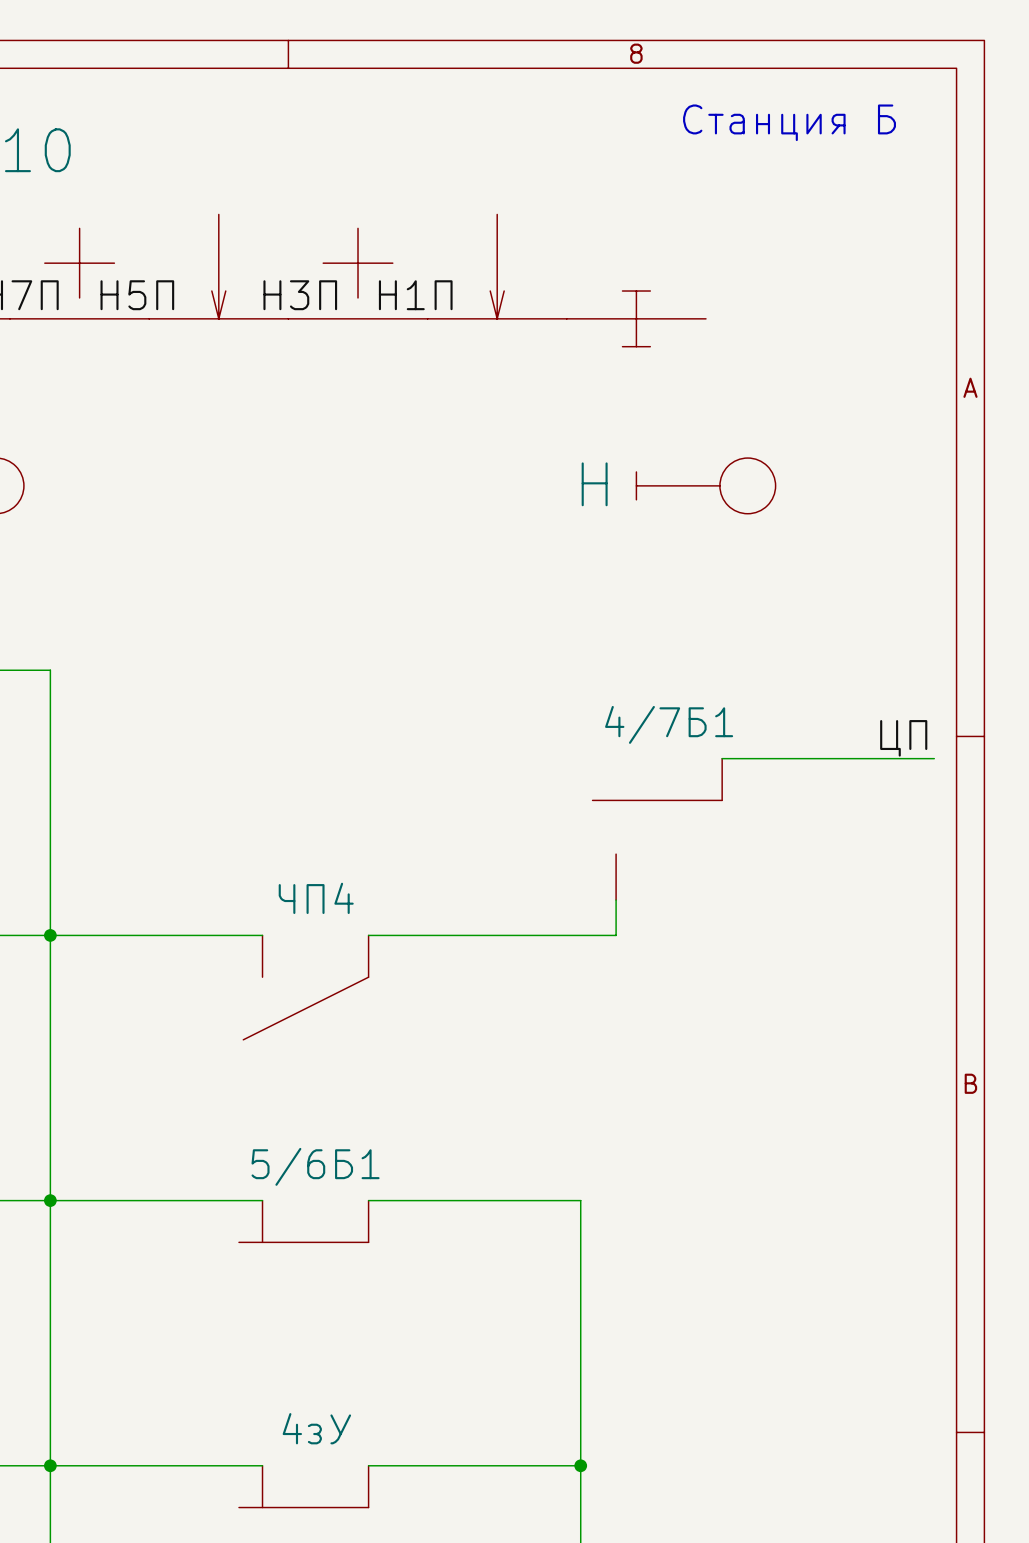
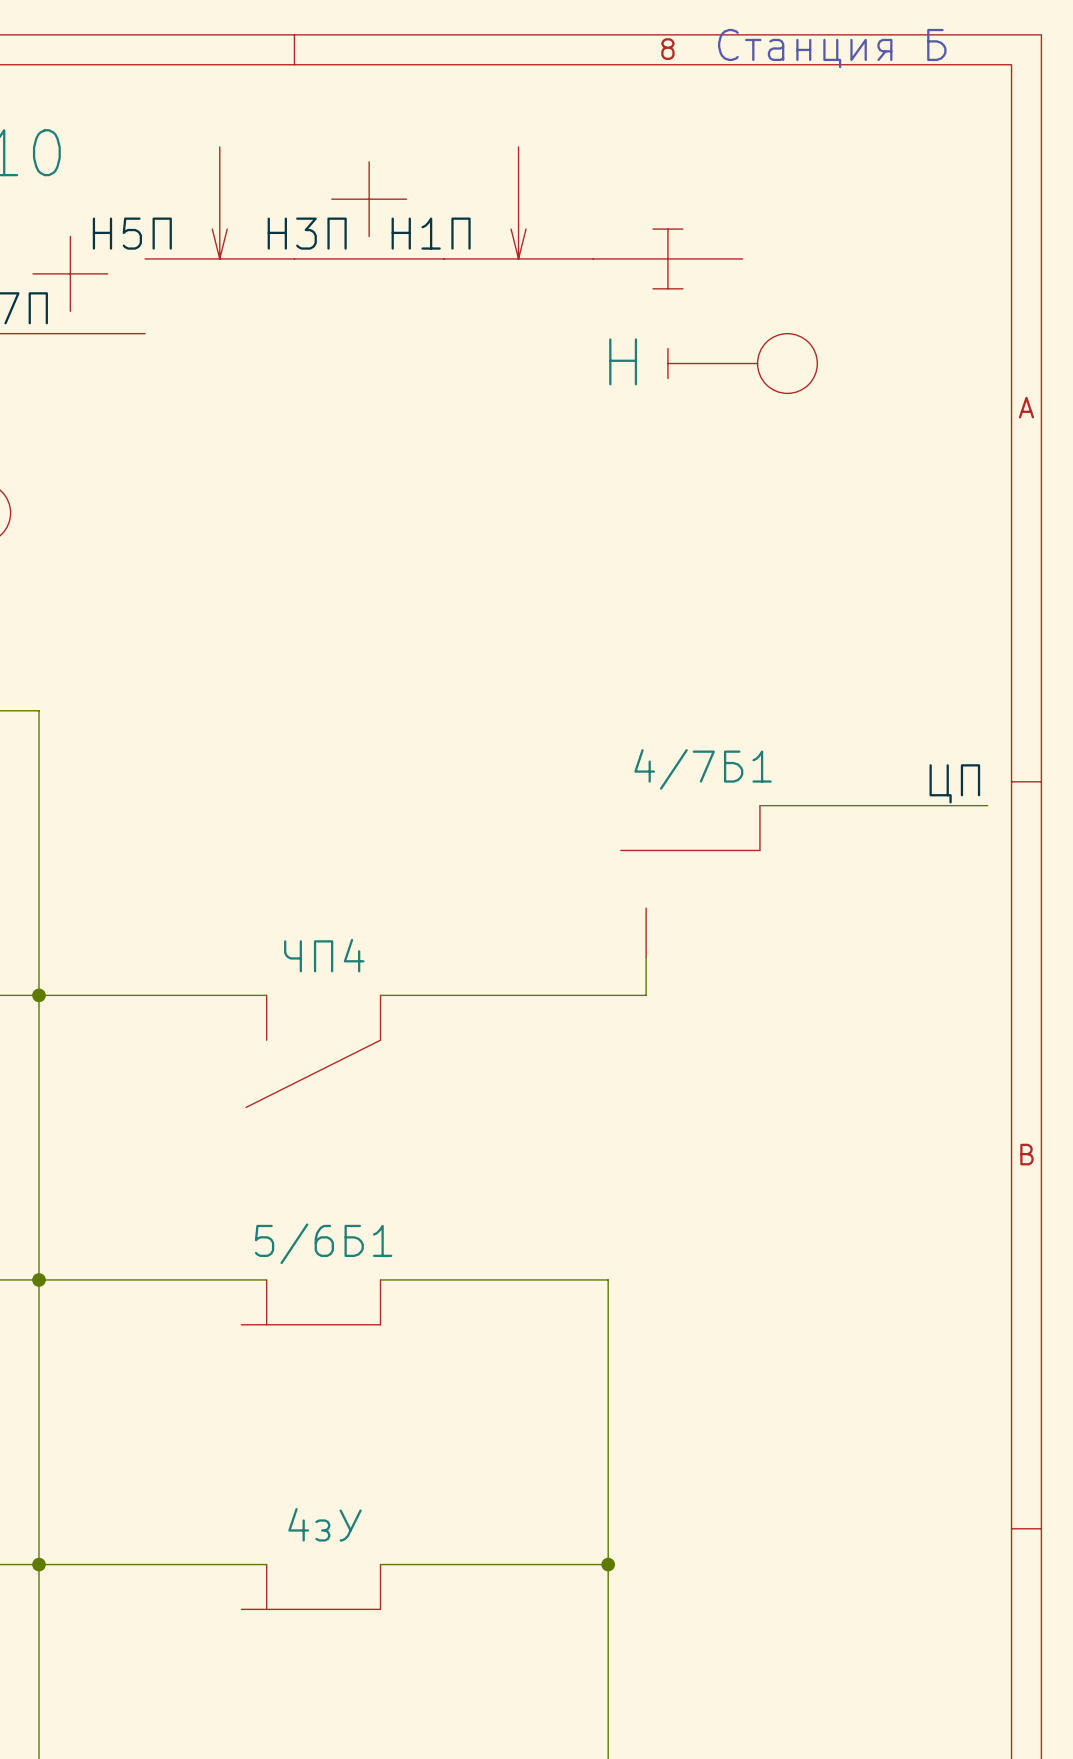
text position: Станция Б (789, 122) -> Станция Б (832, 48)
part position: (218, 266) -> (219, 202)
part position: (497, 266) -> (518, 202)
part position: (358, 273) -> (369, 210)
label position: Н5П (137, 295) -> Н5П (132, 233)
label position: Н3П (300, 295) -> Н3П (307, 233)
label position: Н1П (415, 295) -> Н1П (431, 233)
part position: (636, 318) -> (667, 258)
part position: (706, 485) -> (742, 363)

